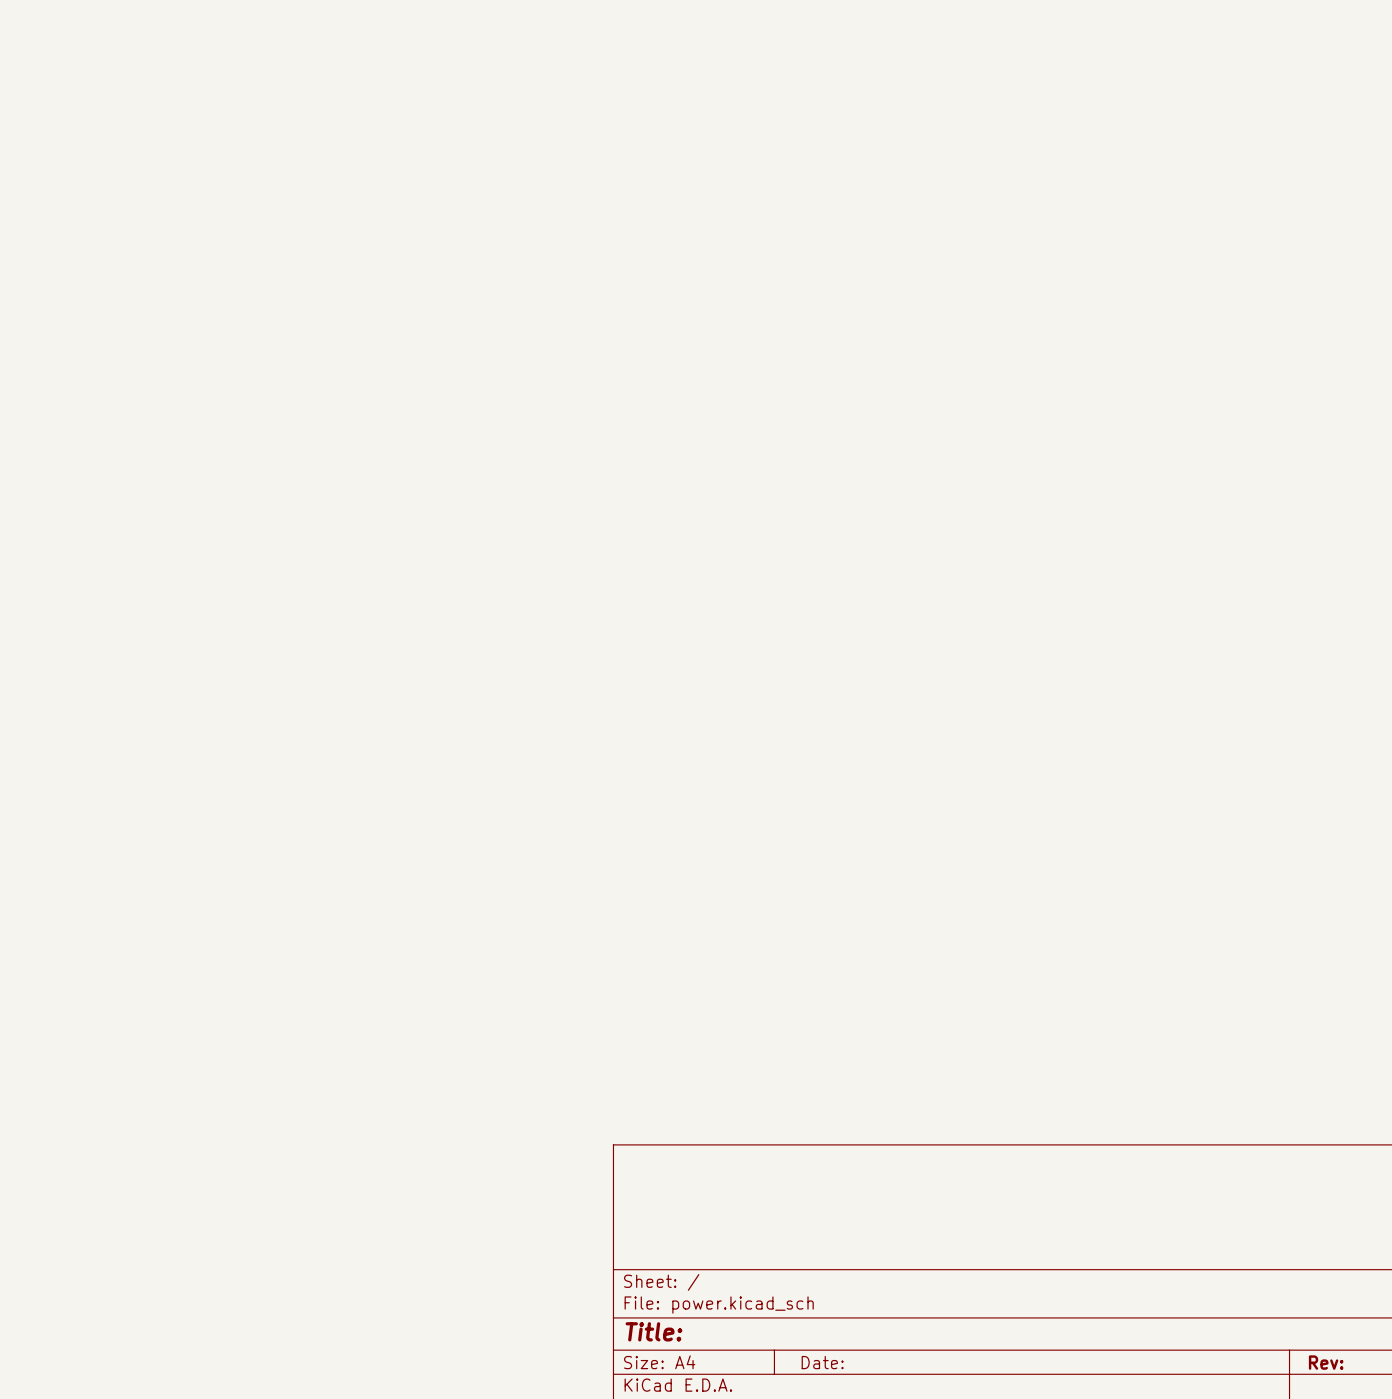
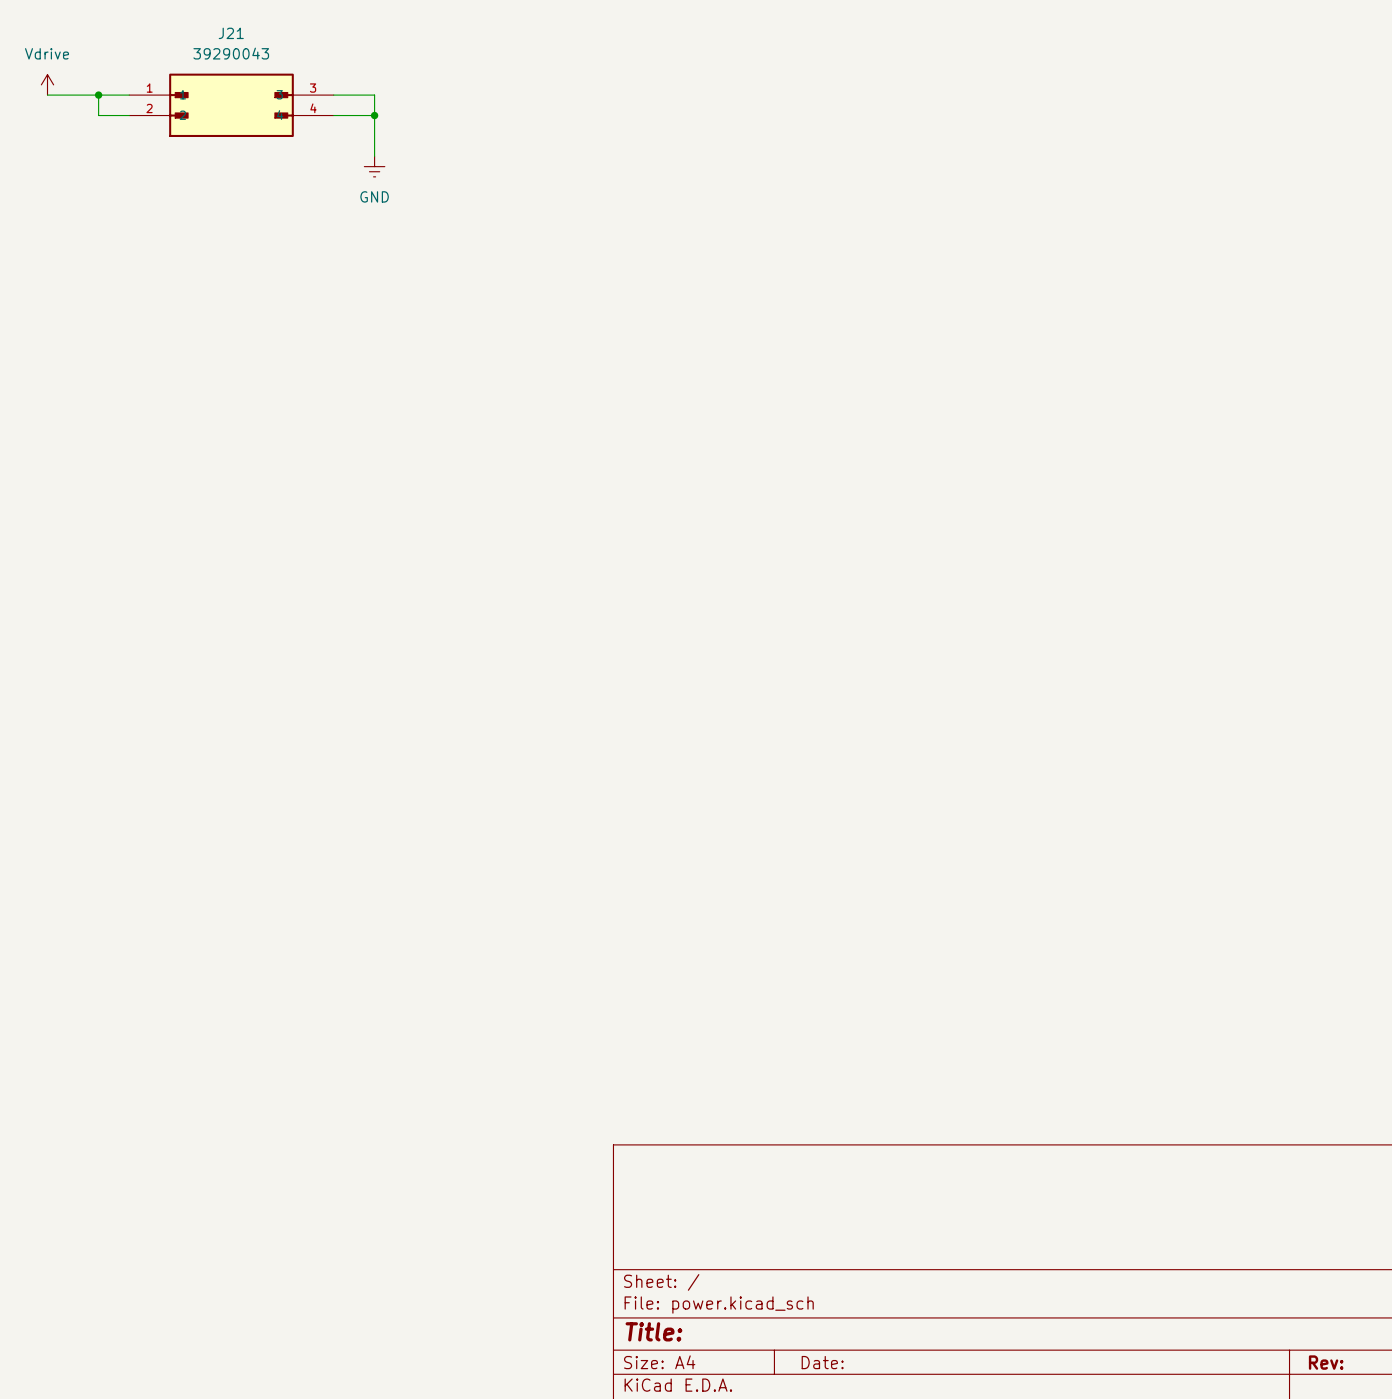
power symbol: none -> Vdrive (47, 84)
wire: none -> (47, 95) (129, 95)
wire: none -> (98, 95) (98, 115) (129, 115)
junction: none -> (98, 95)
wire: none -> (333, 95) (374, 95) (374, 156)
J21: none -> 39290043 (231, 105)
wire: none -> (333, 115) (374, 115)
junction: none -> (374, 115)
power symbol: none -> GND (374, 166)

